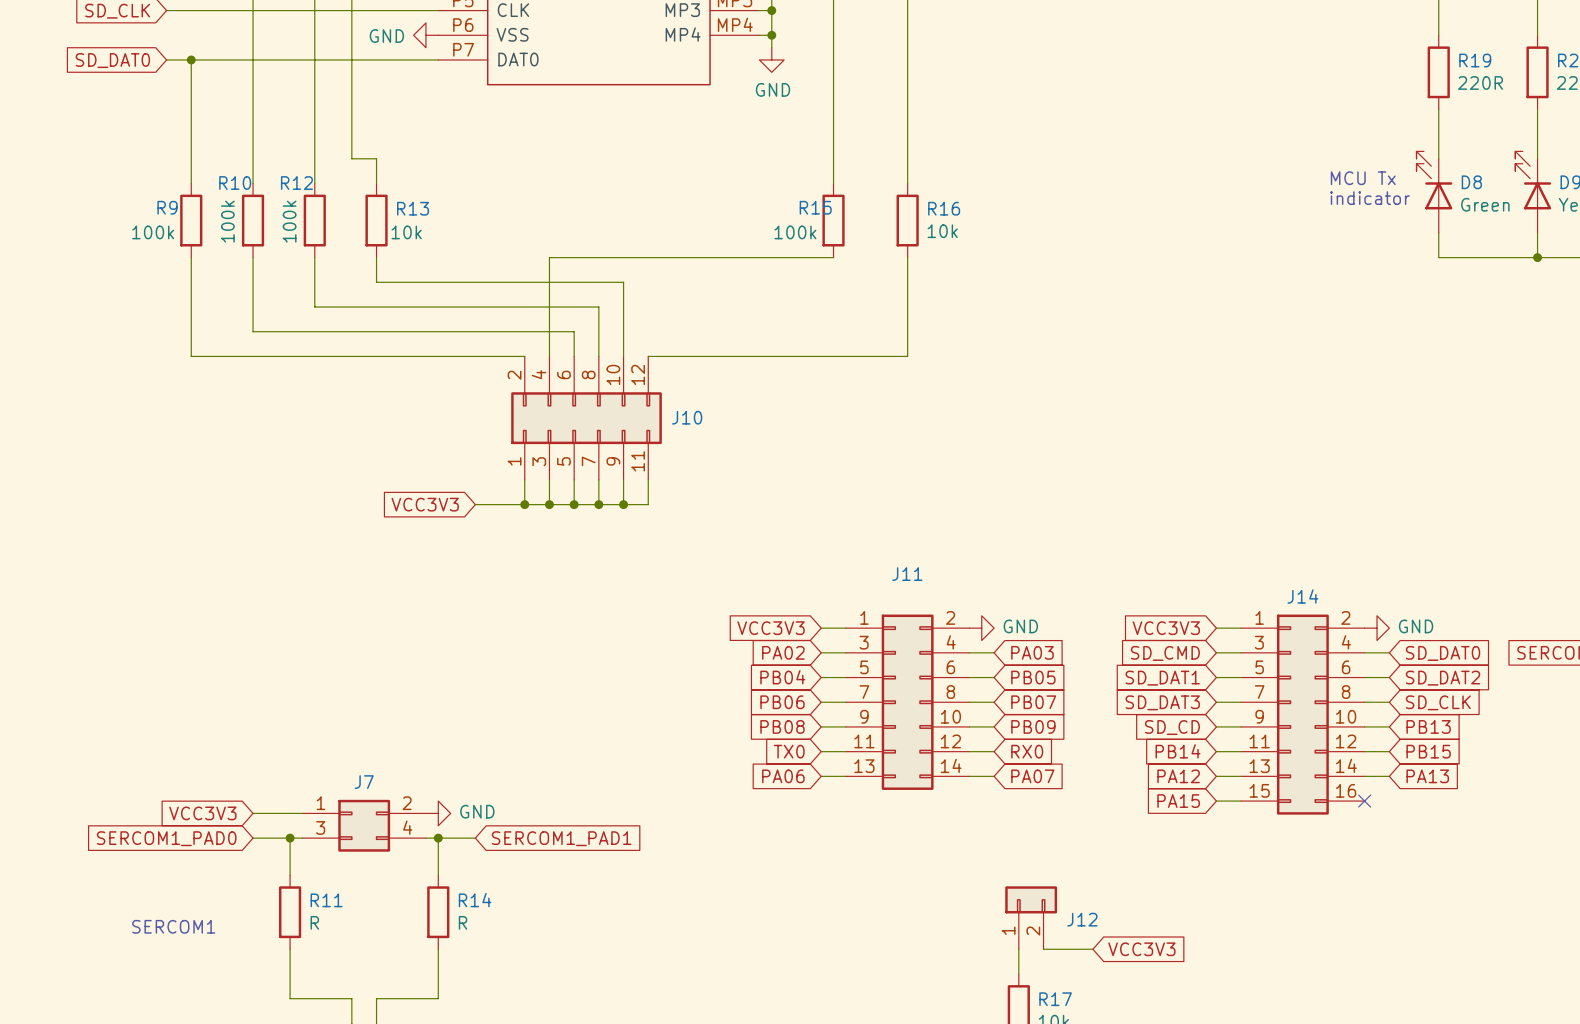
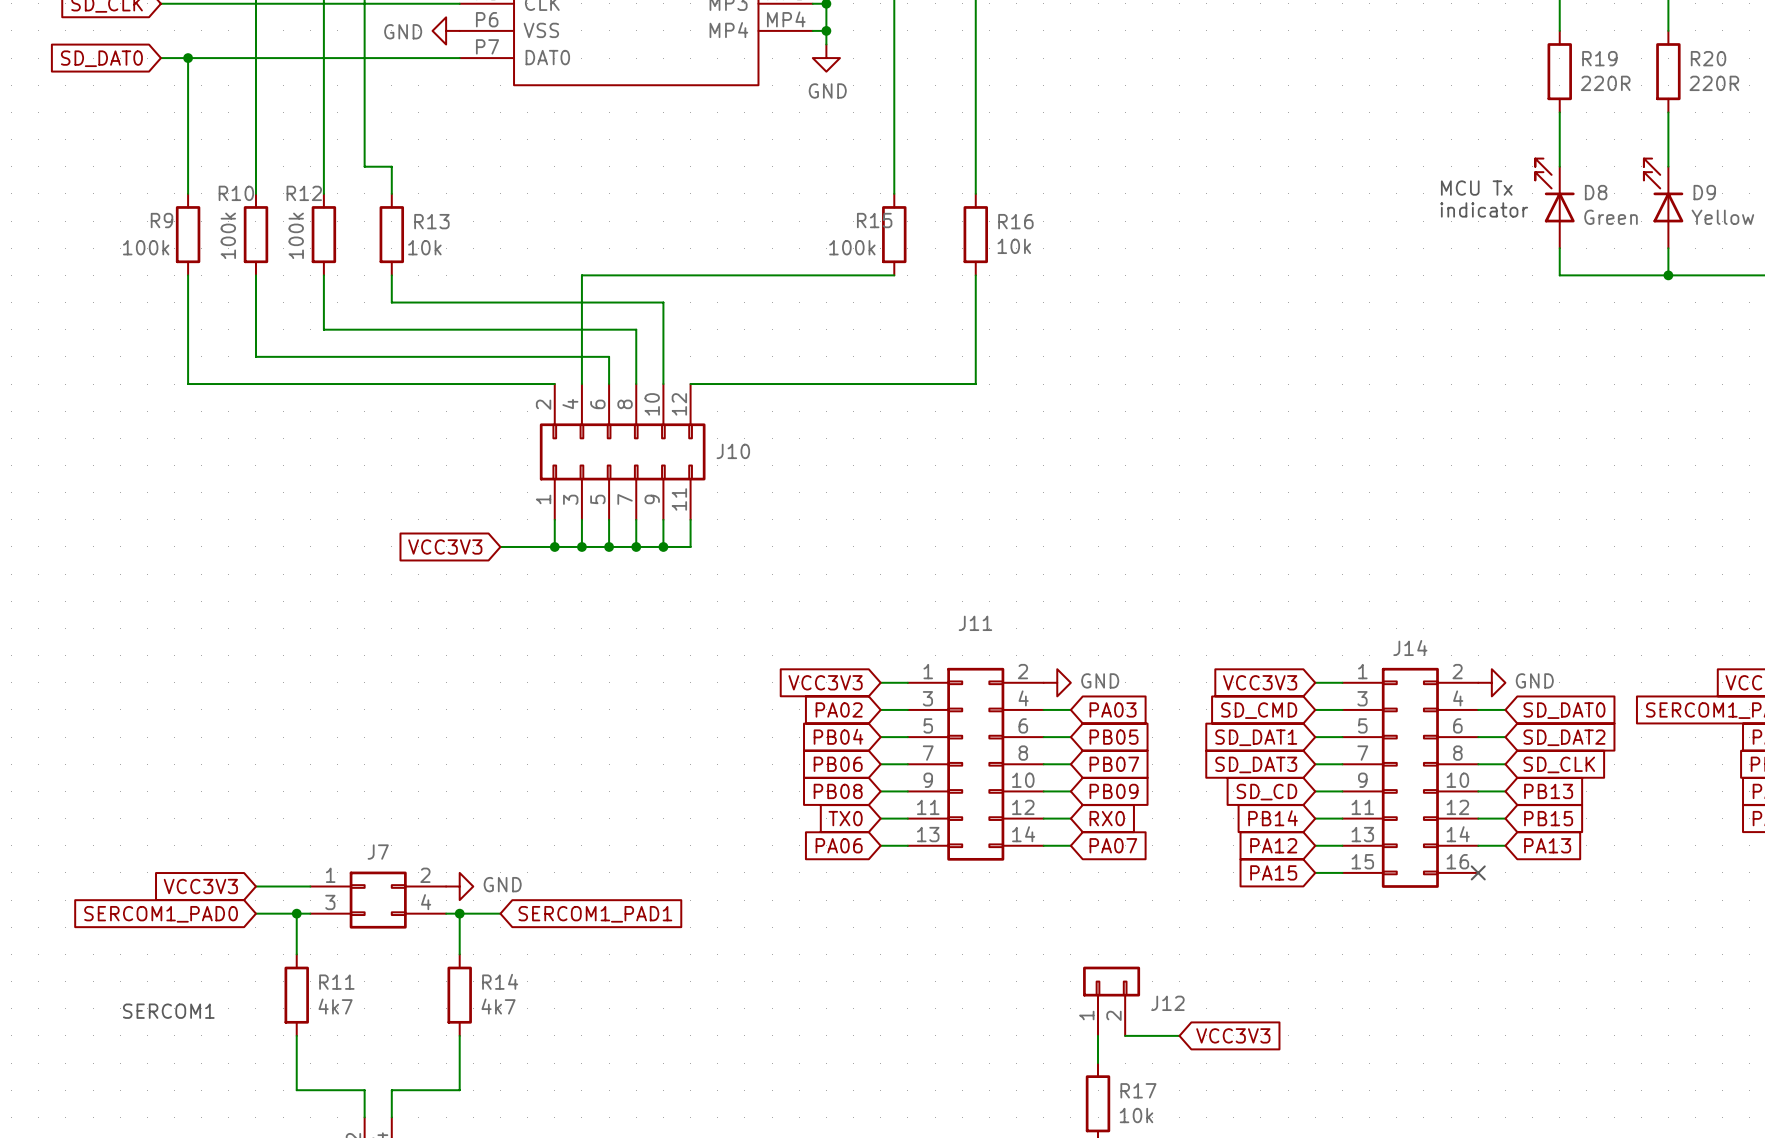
R11 value: R (314, 922) -> 4k7 (335, 1006)
R14 value: R (463, 922) -> 4k7 (498, 1006)

